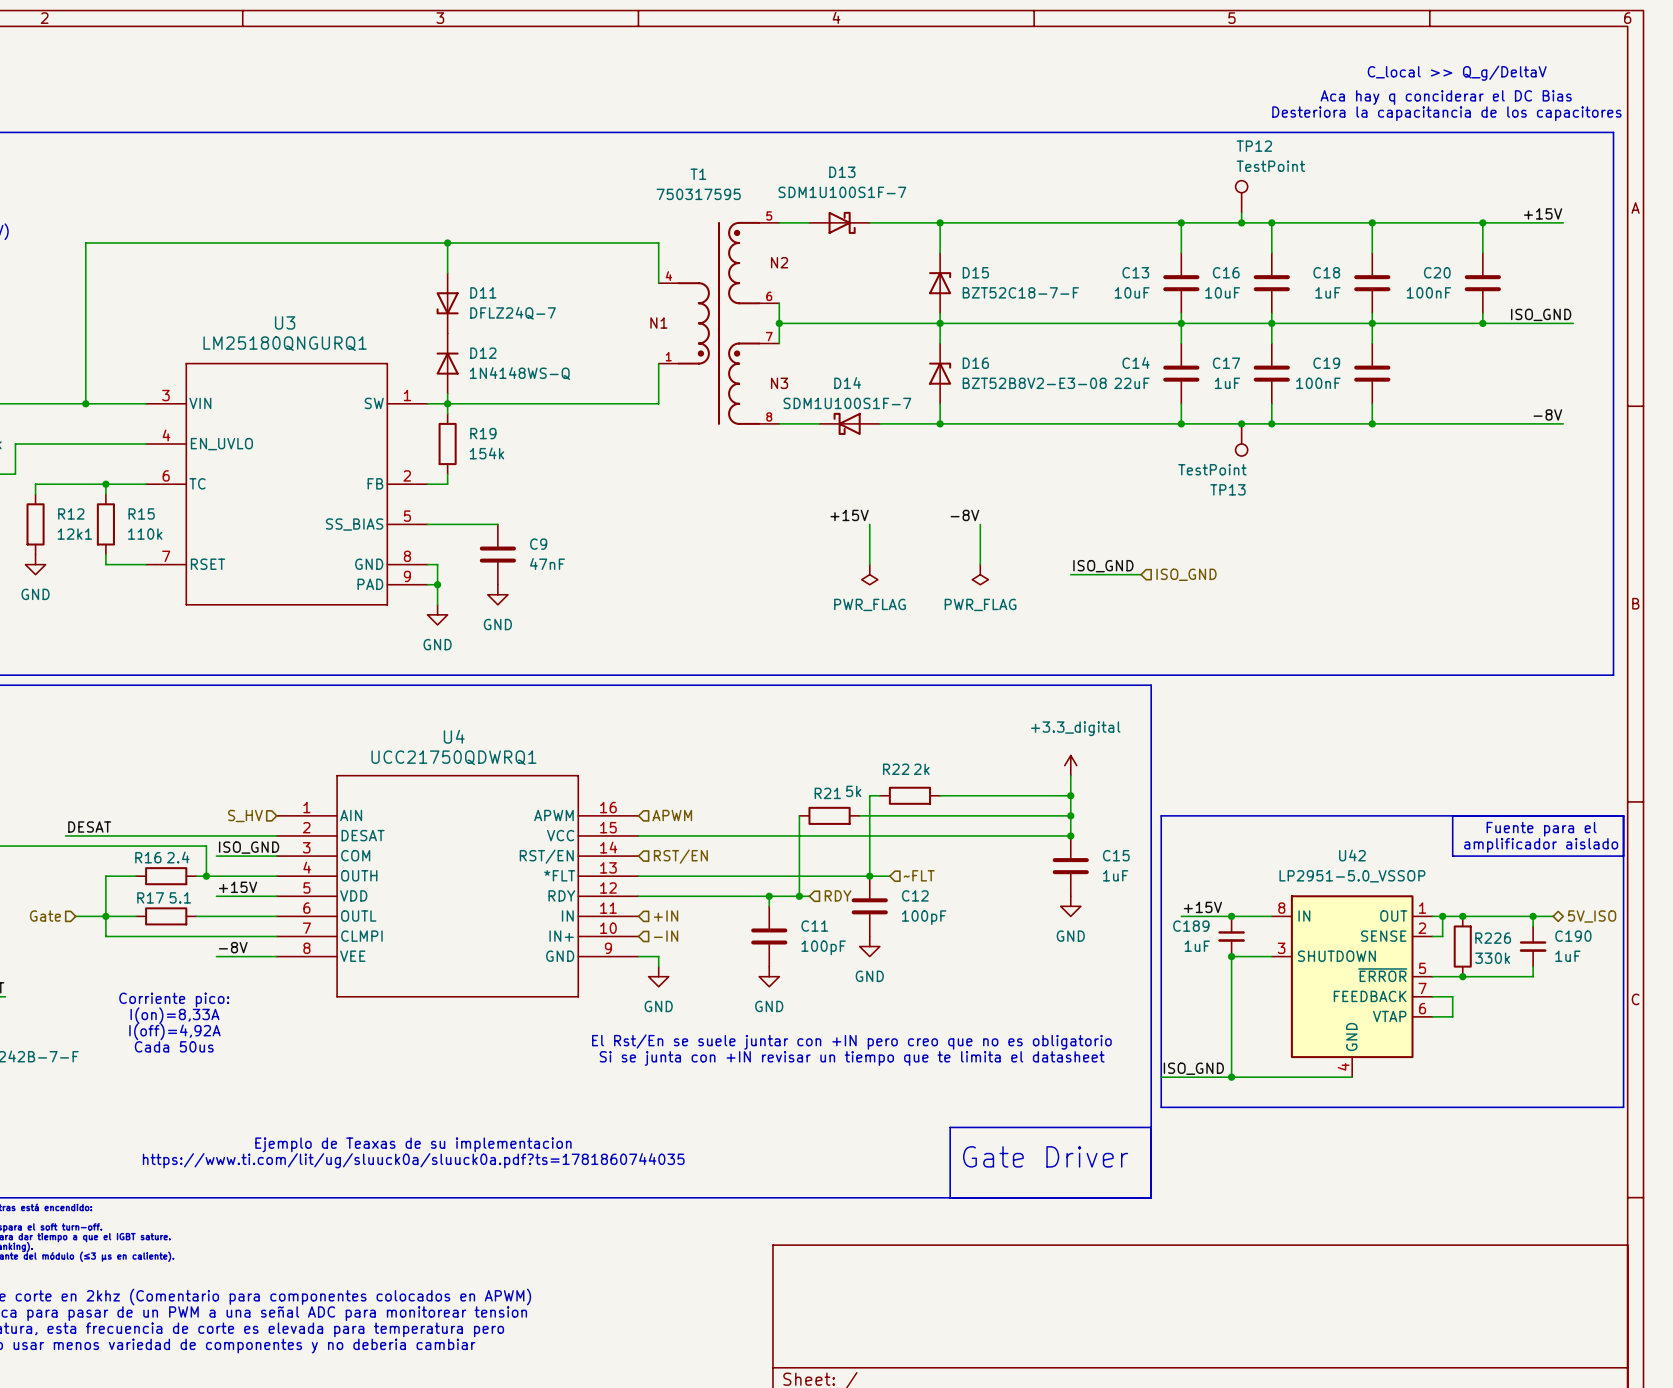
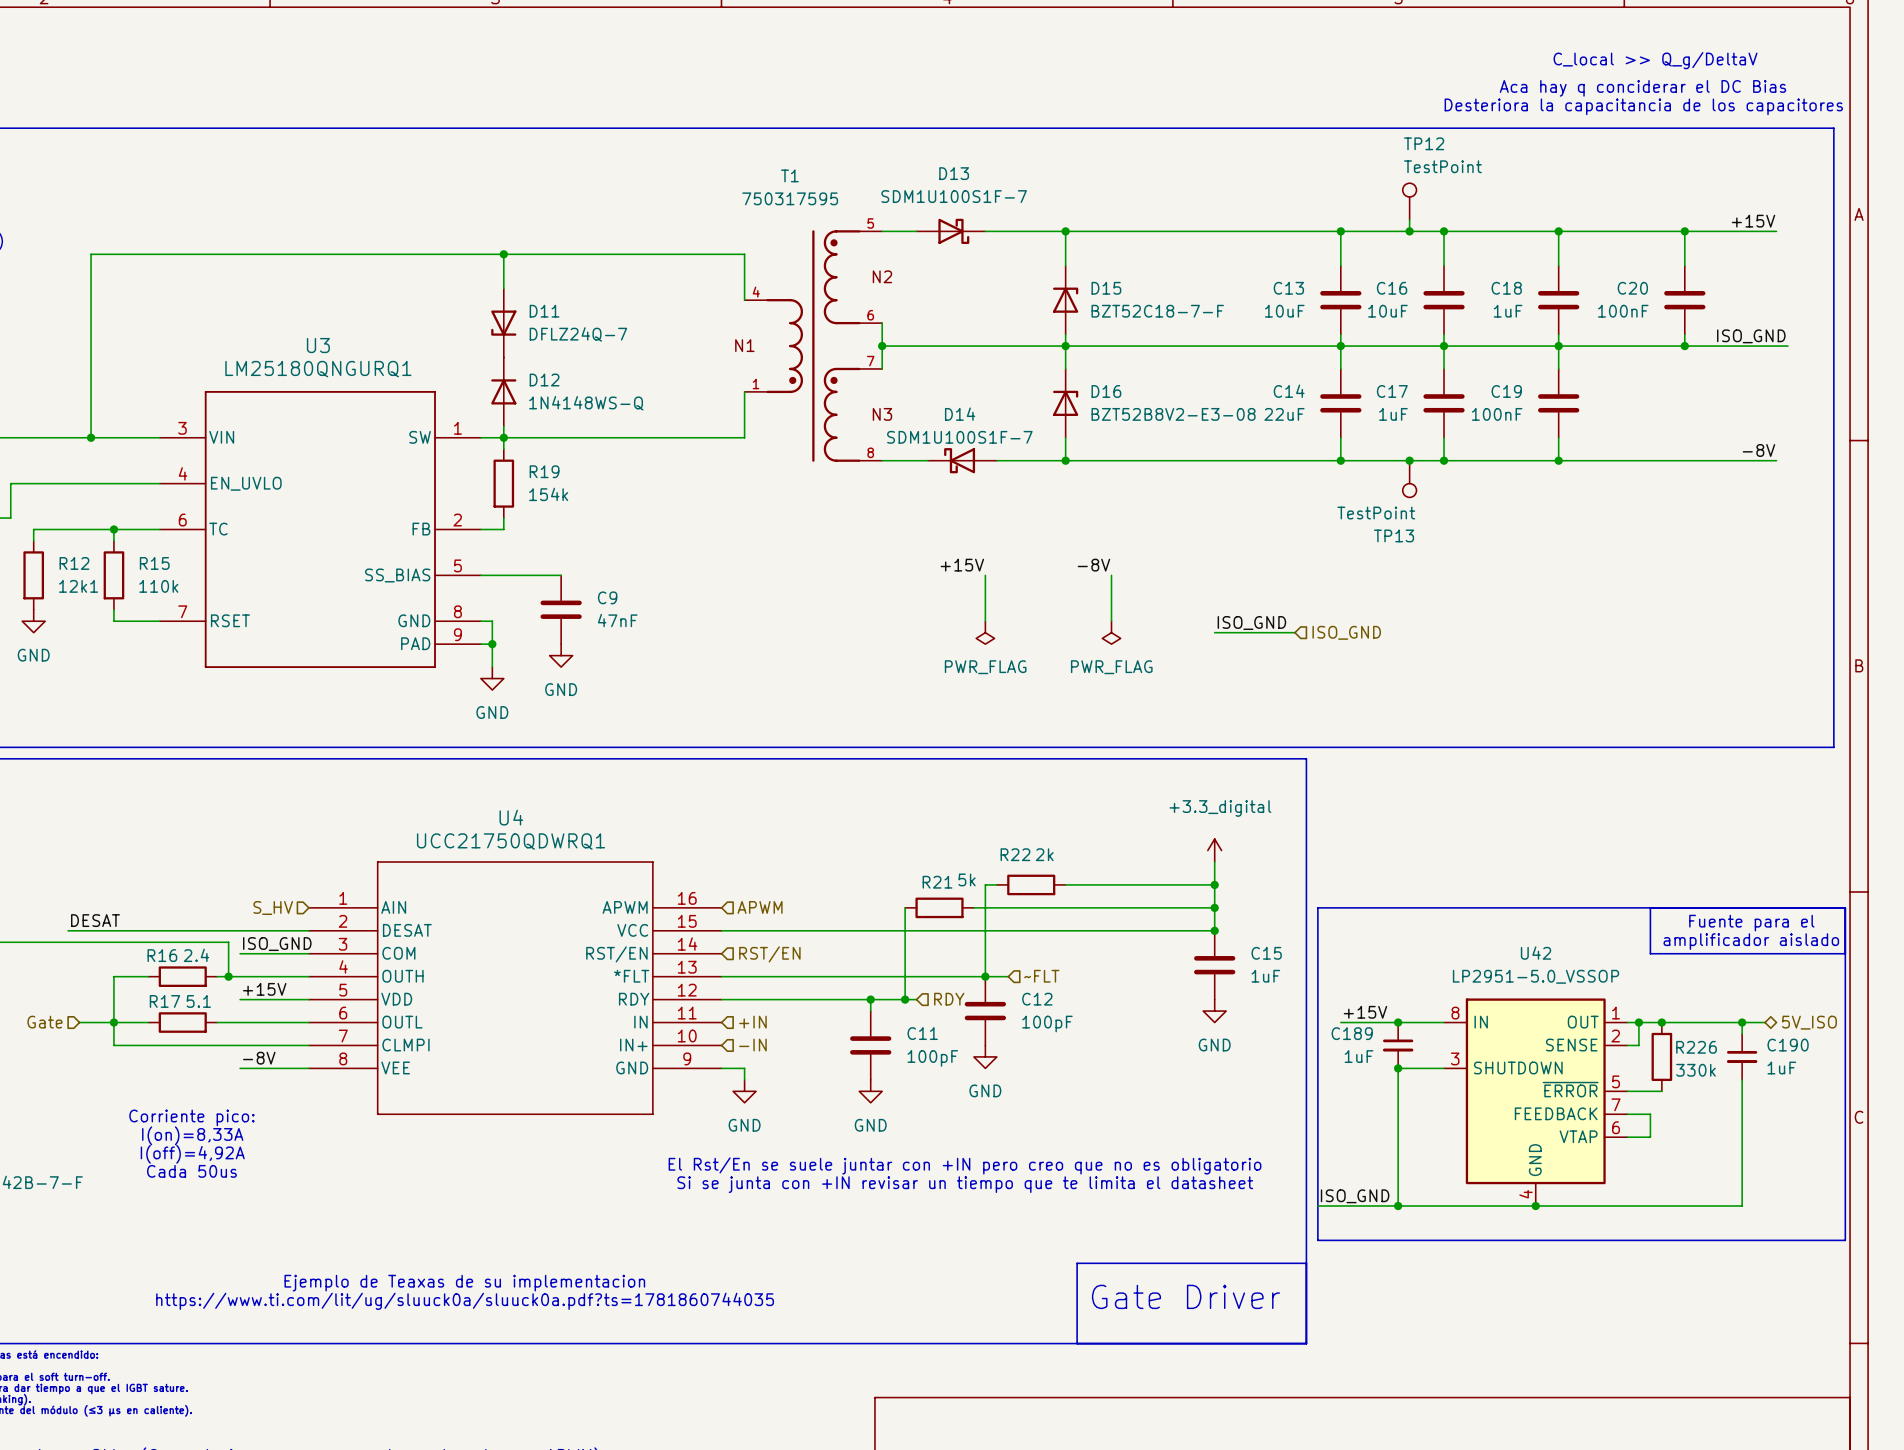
wire: (1462, 976) (1533, 976) -> (1535, 1205) (1742, 1205) (1742, 1091)
junction: (1462, 976) -> none
junction: none -> (1535, 1205)

